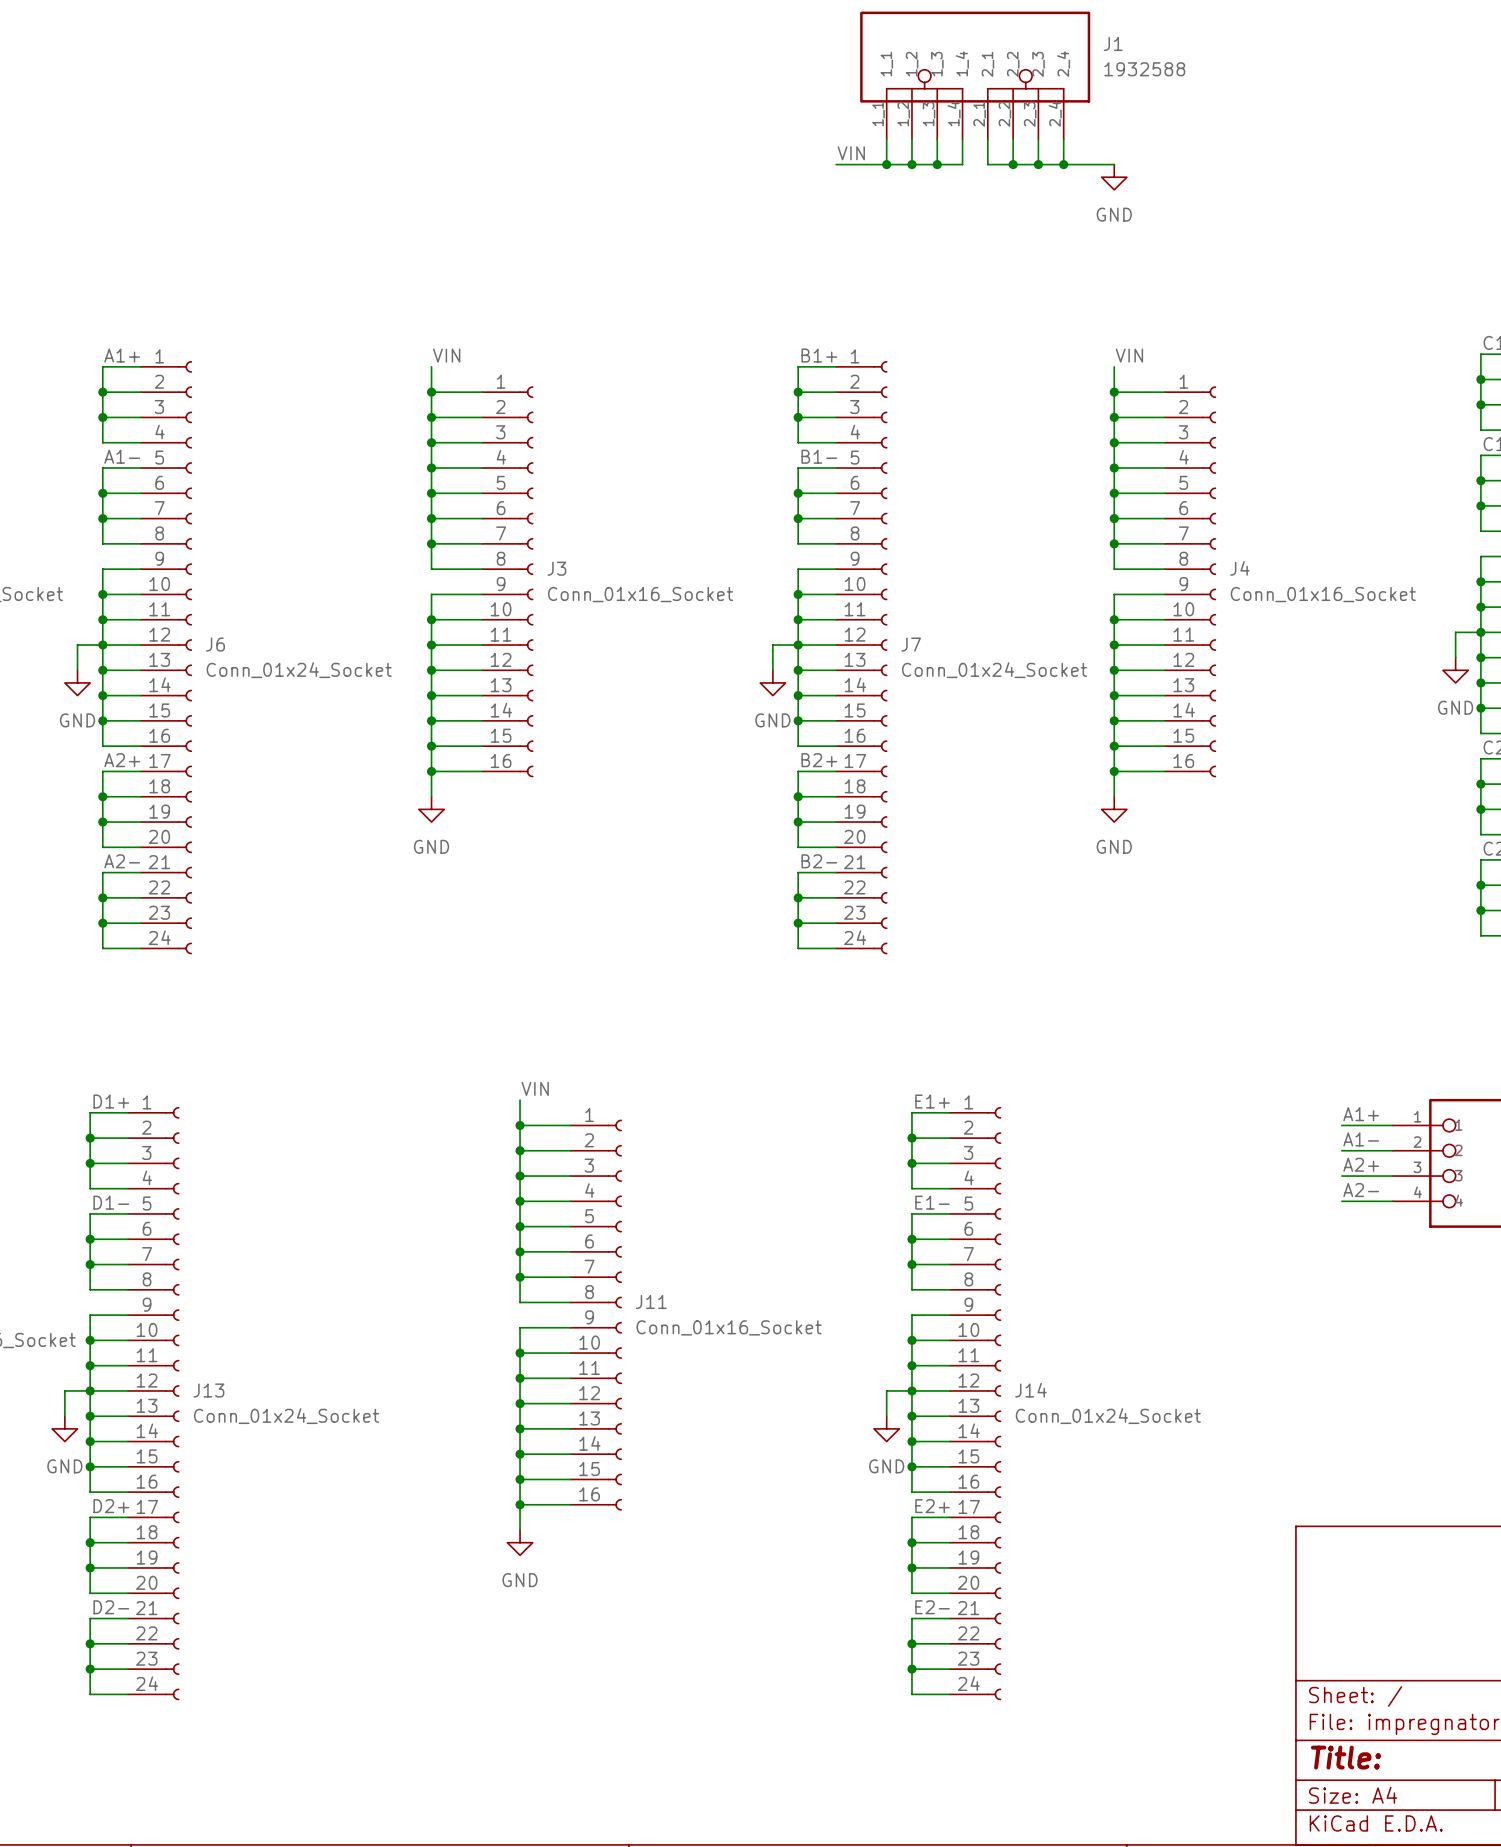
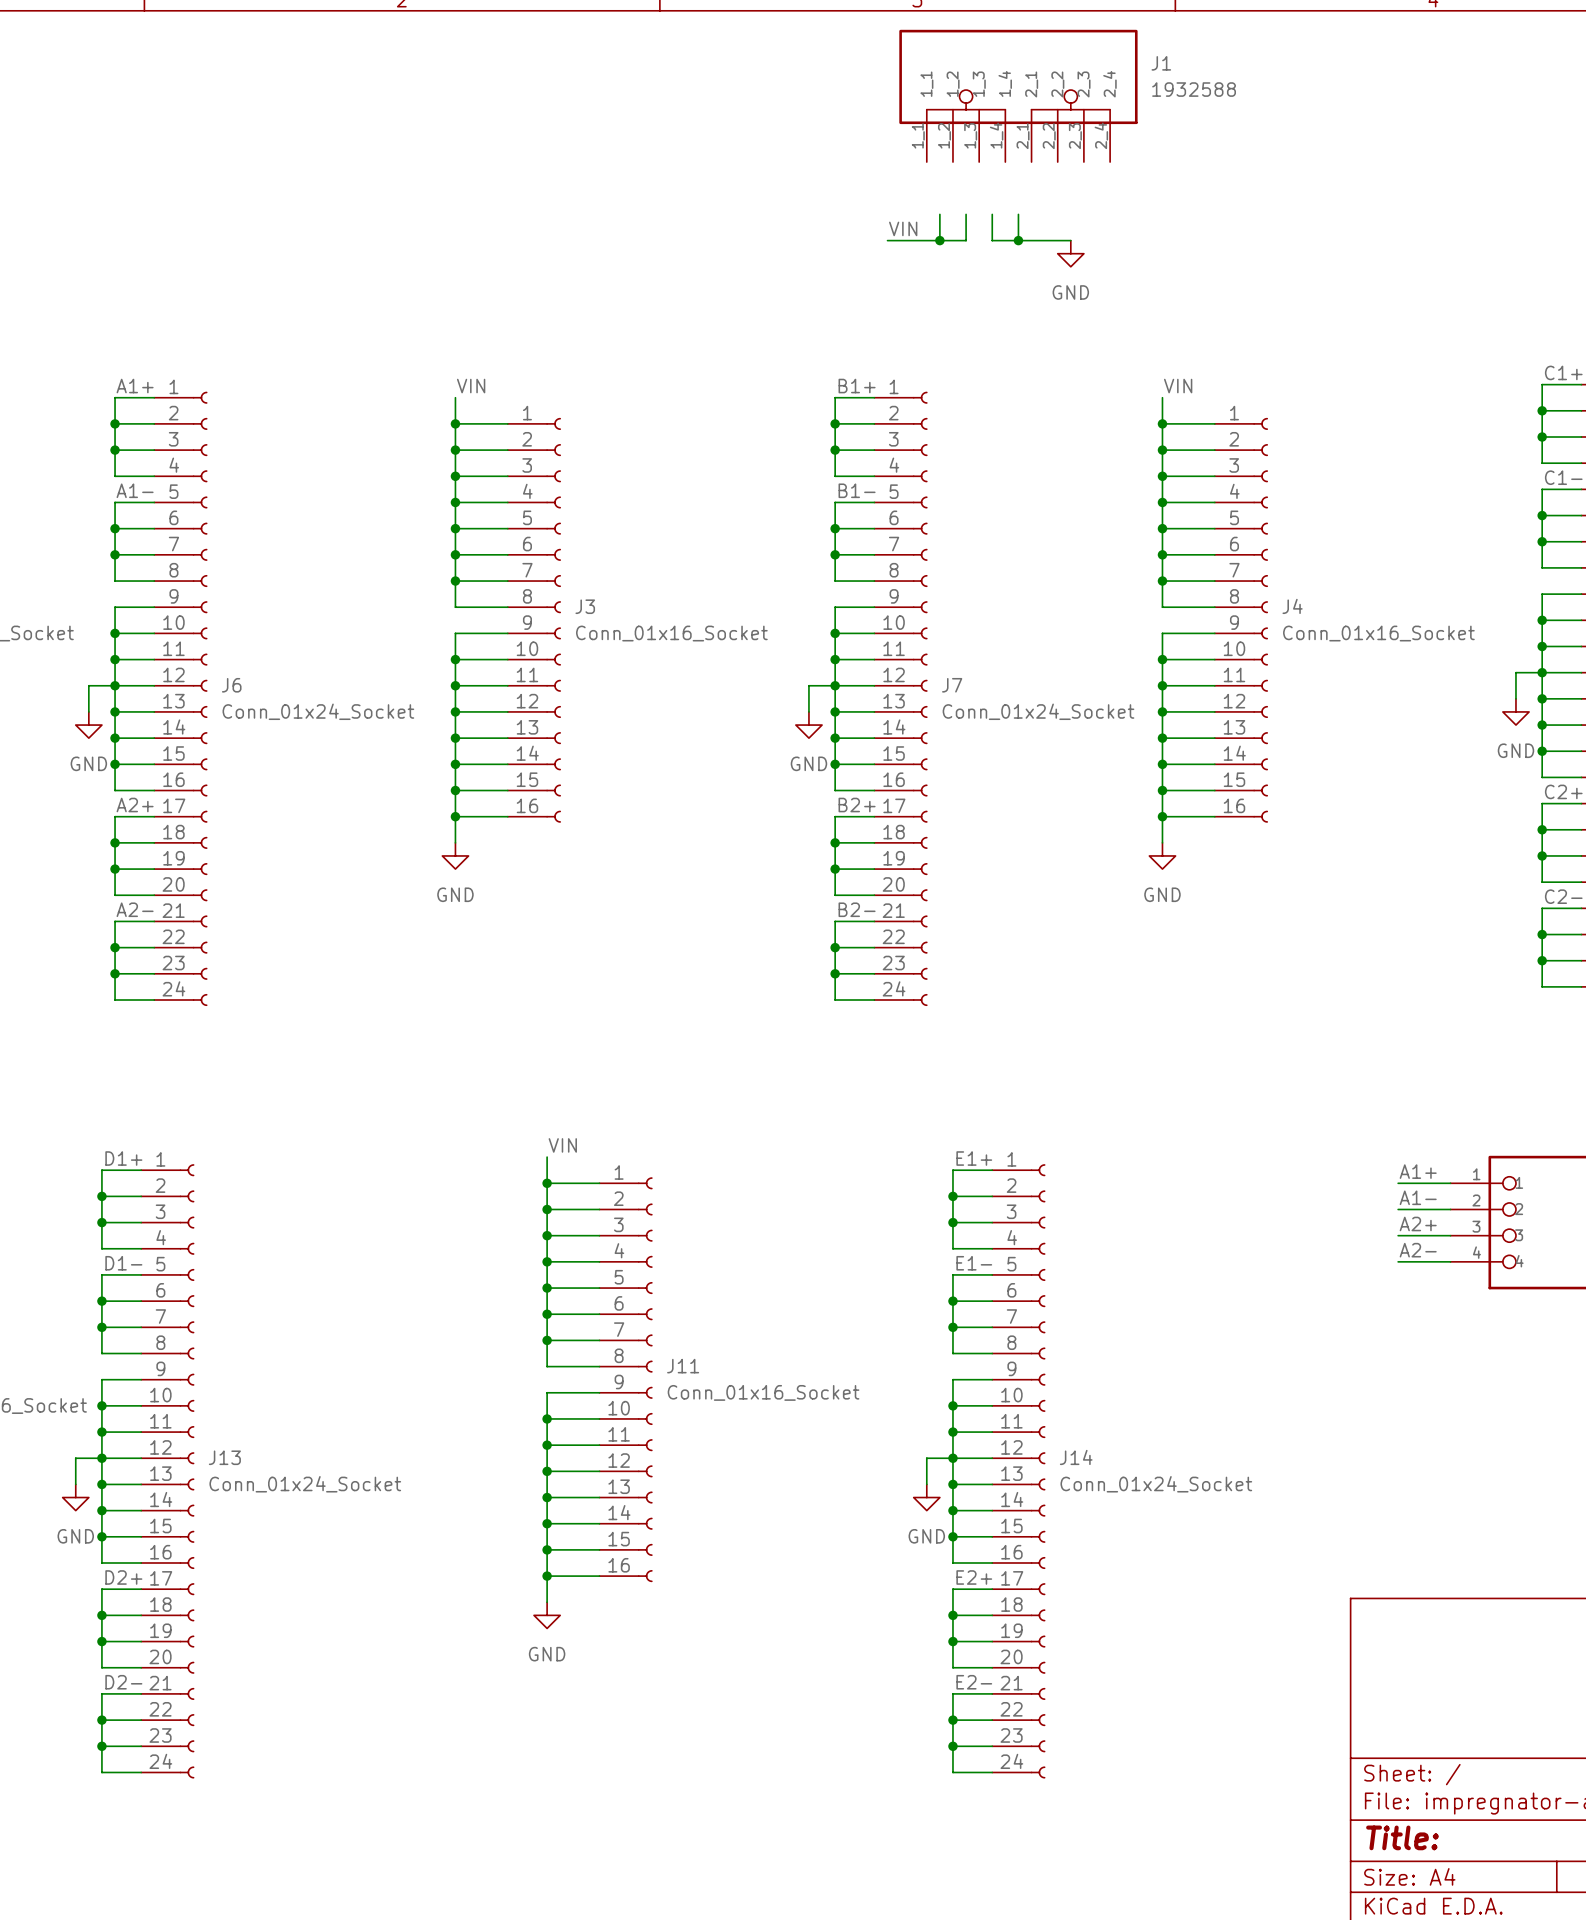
wire: (886, 139) (886, 164) -> none
wire: (911, 139) (911, 164) -> none
wire: (937, 139) (937, 164) -> (939, 214) (939, 240)
wire: (962, 139) (962, 164) (836, 164) -> none
wire: (987, 139) (987, 164) (1114, 164) -> none
wire: (1013, 139) (1013, 164) -> (1018, 214) (1018, 240)
wire: (1038, 139) (1038, 164) -> none
wire: (1063, 139) (1063, 164) -> none
label position: VIN (851, 153) -> VIN (903, 228)
junction: (886, 164) -> none
junction: (911, 164) -> none
junction: (937, 164) -> none
junction: (1013, 164) -> none
junction: (1038, 164) -> none
junction: (1063, 164) -> none
power symbol position: GND (1114, 177) -> GND (1070, 253)
wire: none -> (966, 214) (966, 240) (887, 240)
wire: none -> (992, 214) (992, 240) (1070, 240)
junction: none -> (939, 240)
junction: none -> (1018, 240)

